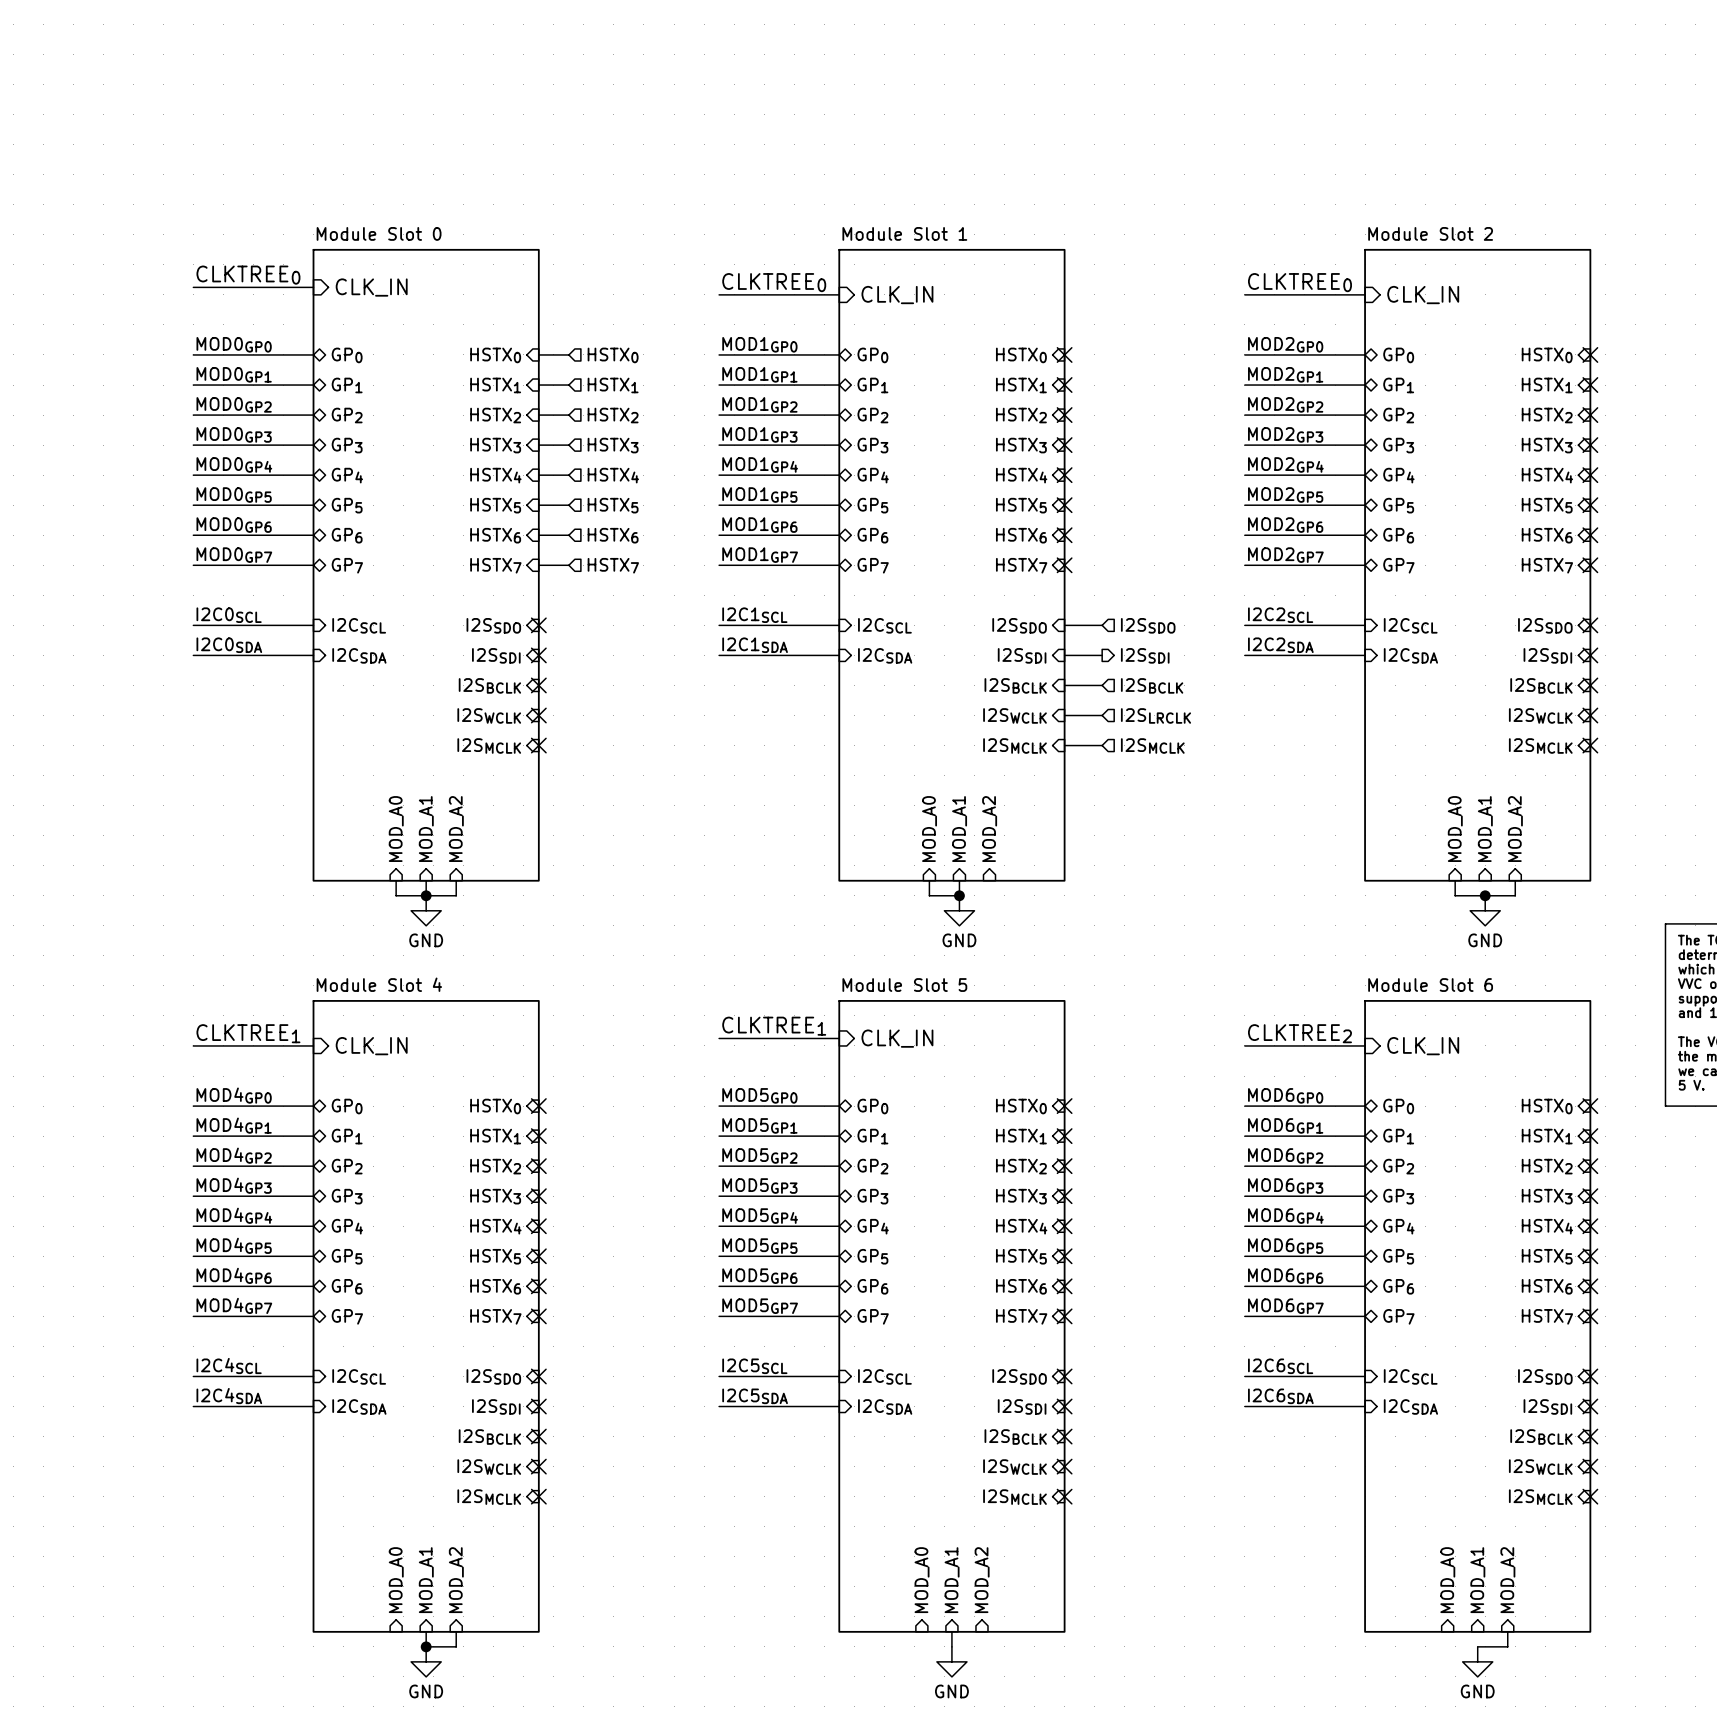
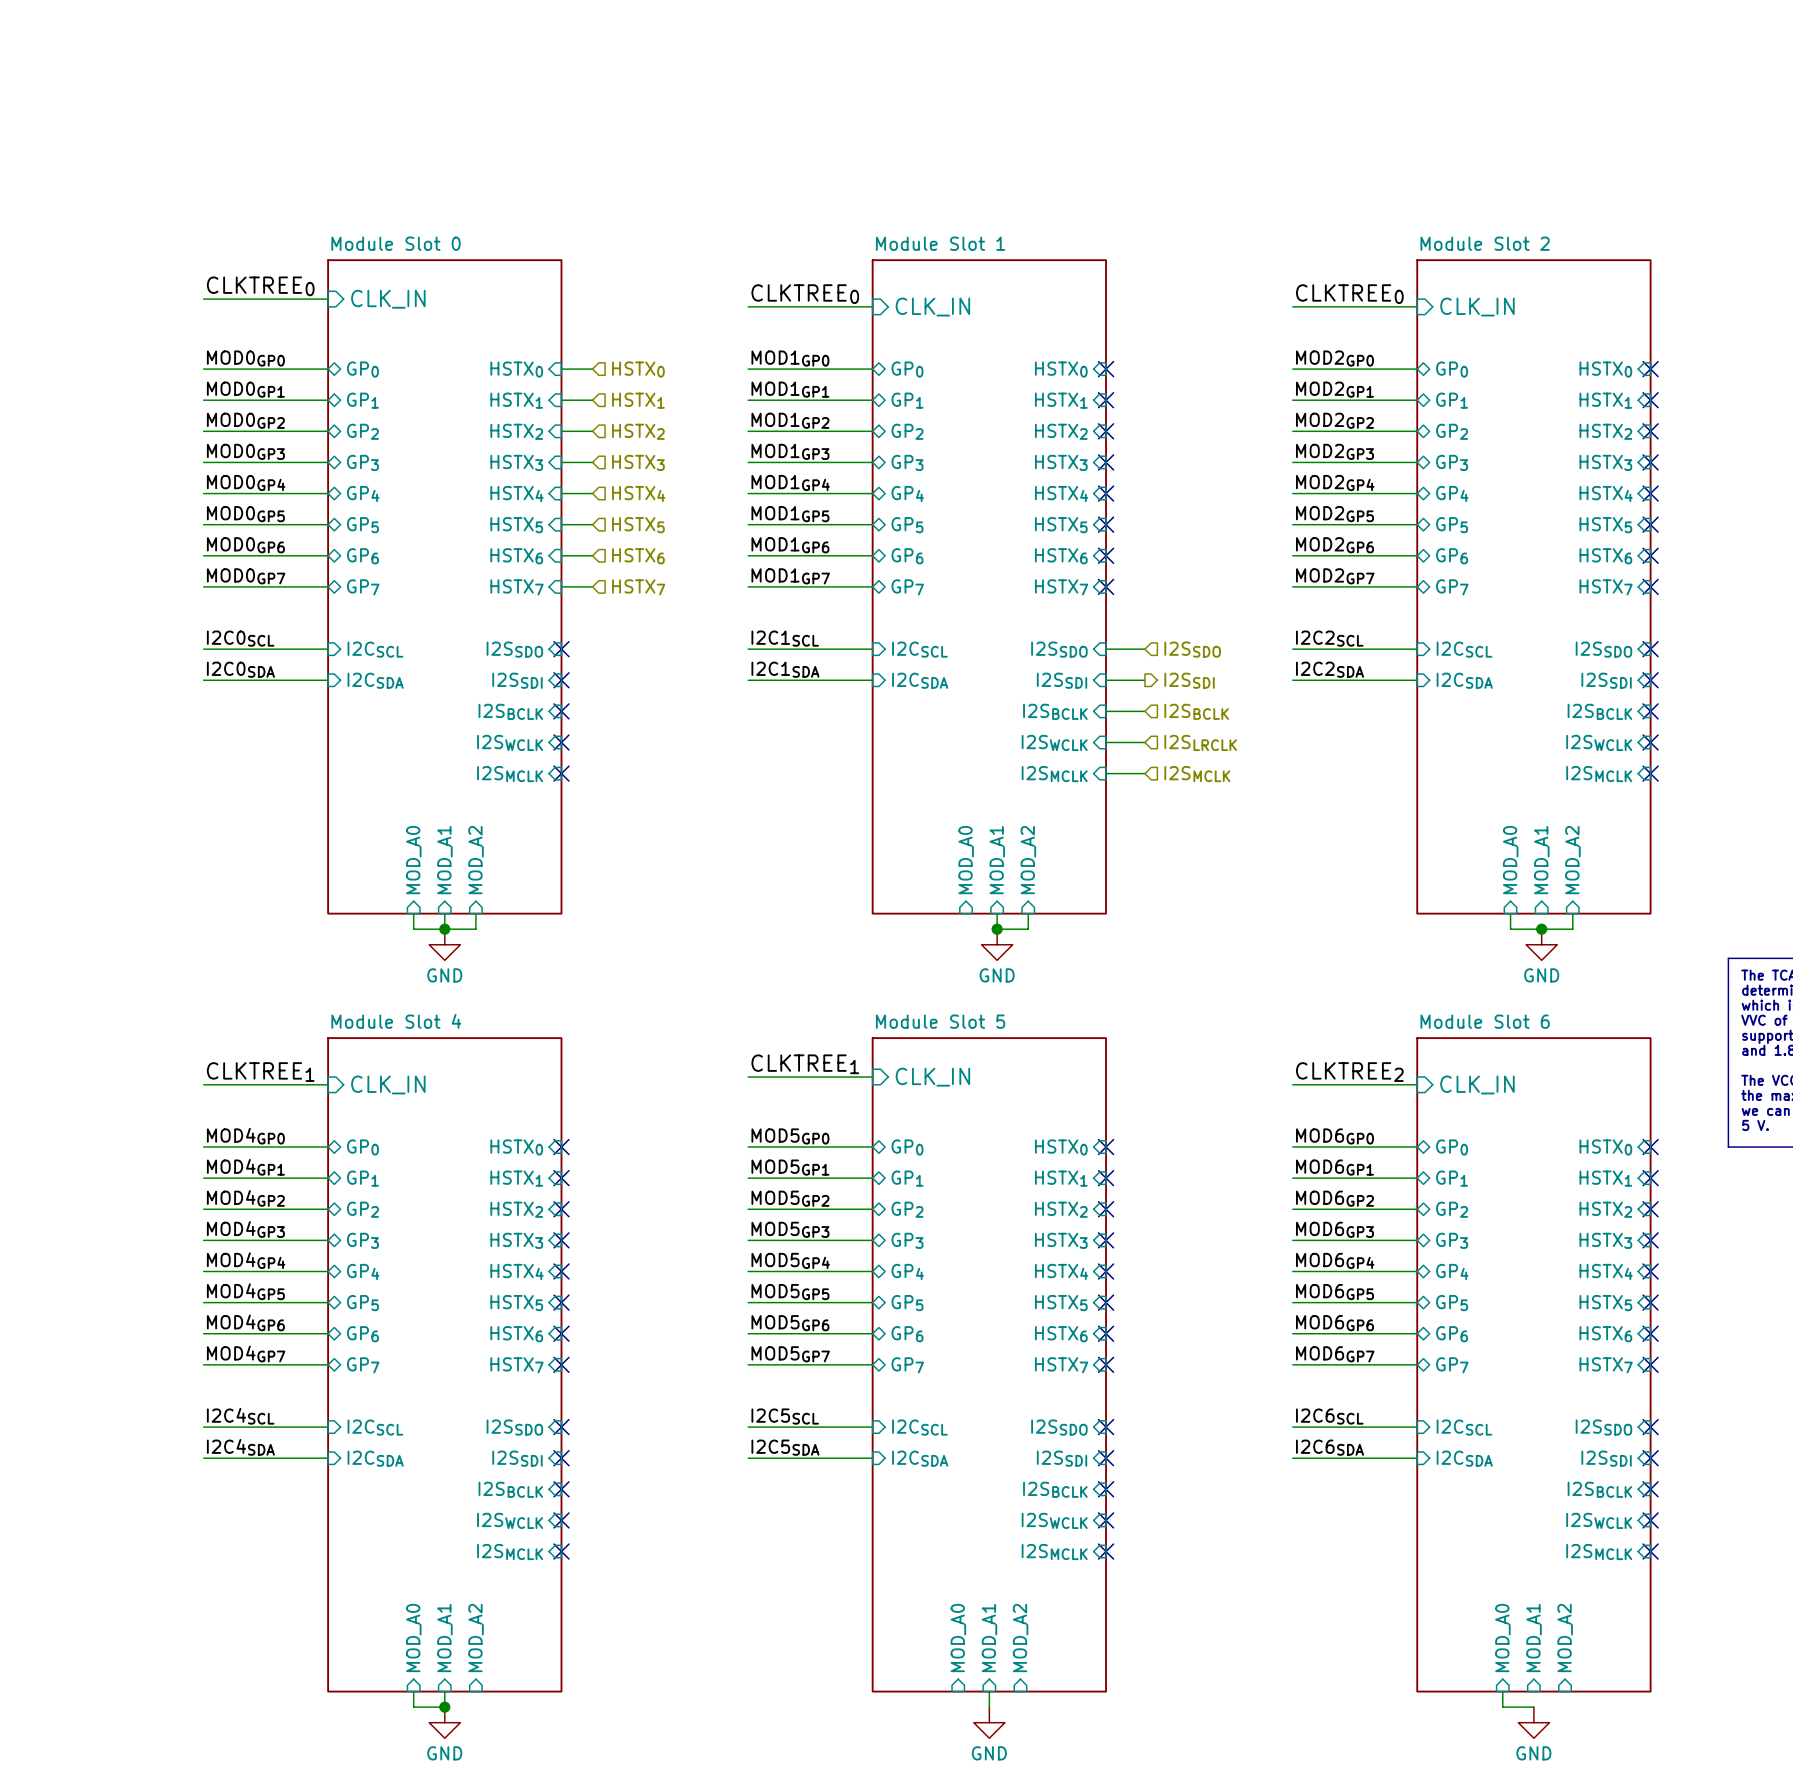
wire: (929, 880) (929, 895) (959, 895) -> (1028, 913) (1028, 929) (997, 929)
wire: (456, 1631) (456, 1646) (426, 1646) -> (413, 1691) (413, 1707) (444, 1707)
wire: (1507, 1631) (1507, 1646) (1477, 1646) -> (1502, 1691) (1502, 1707) (1533, 1707)

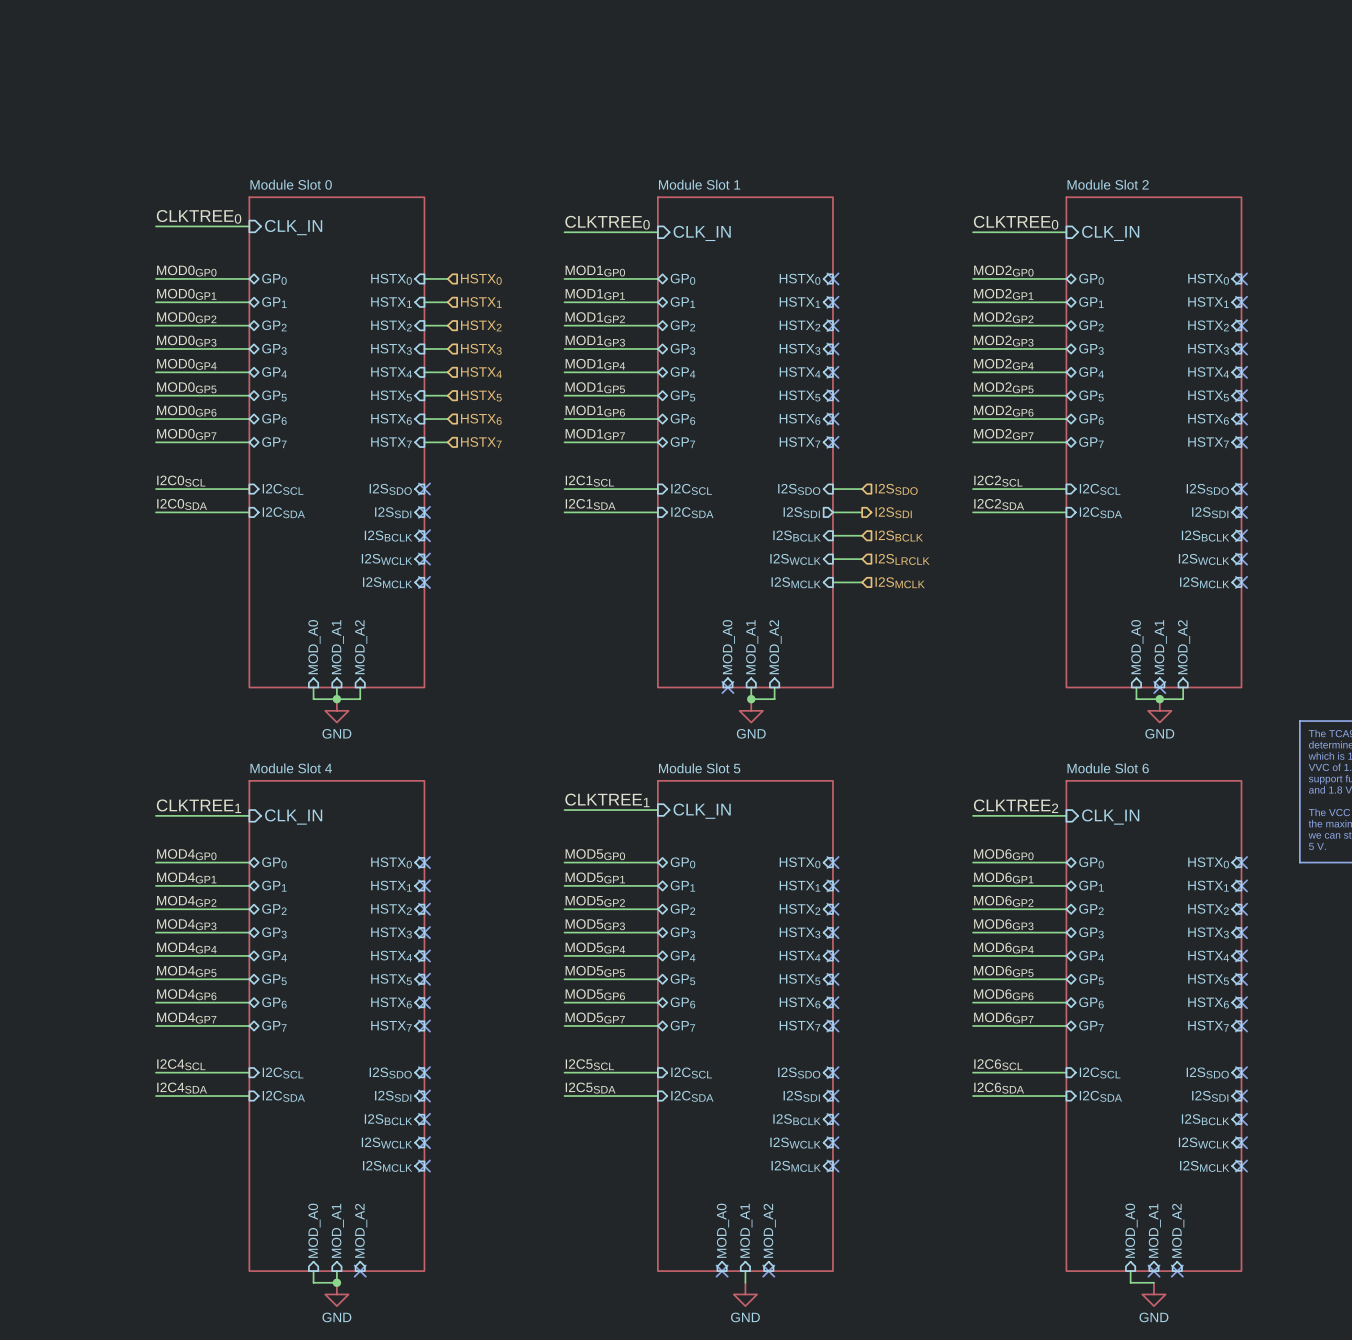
sheet pin shape: input (1062, 680) -> output (801, 512)
no-connect mark: none -> (727, 687)
no-connect mark: none -> (1159, 687)
no-connect mark: none -> (360, 1271)
no-connect mark: none -> (722, 1271)
no-connect mark: none -> (768, 1271)
no-connect mark: none -> (1153, 1271)
no-connect mark: none -> (1177, 1271)

